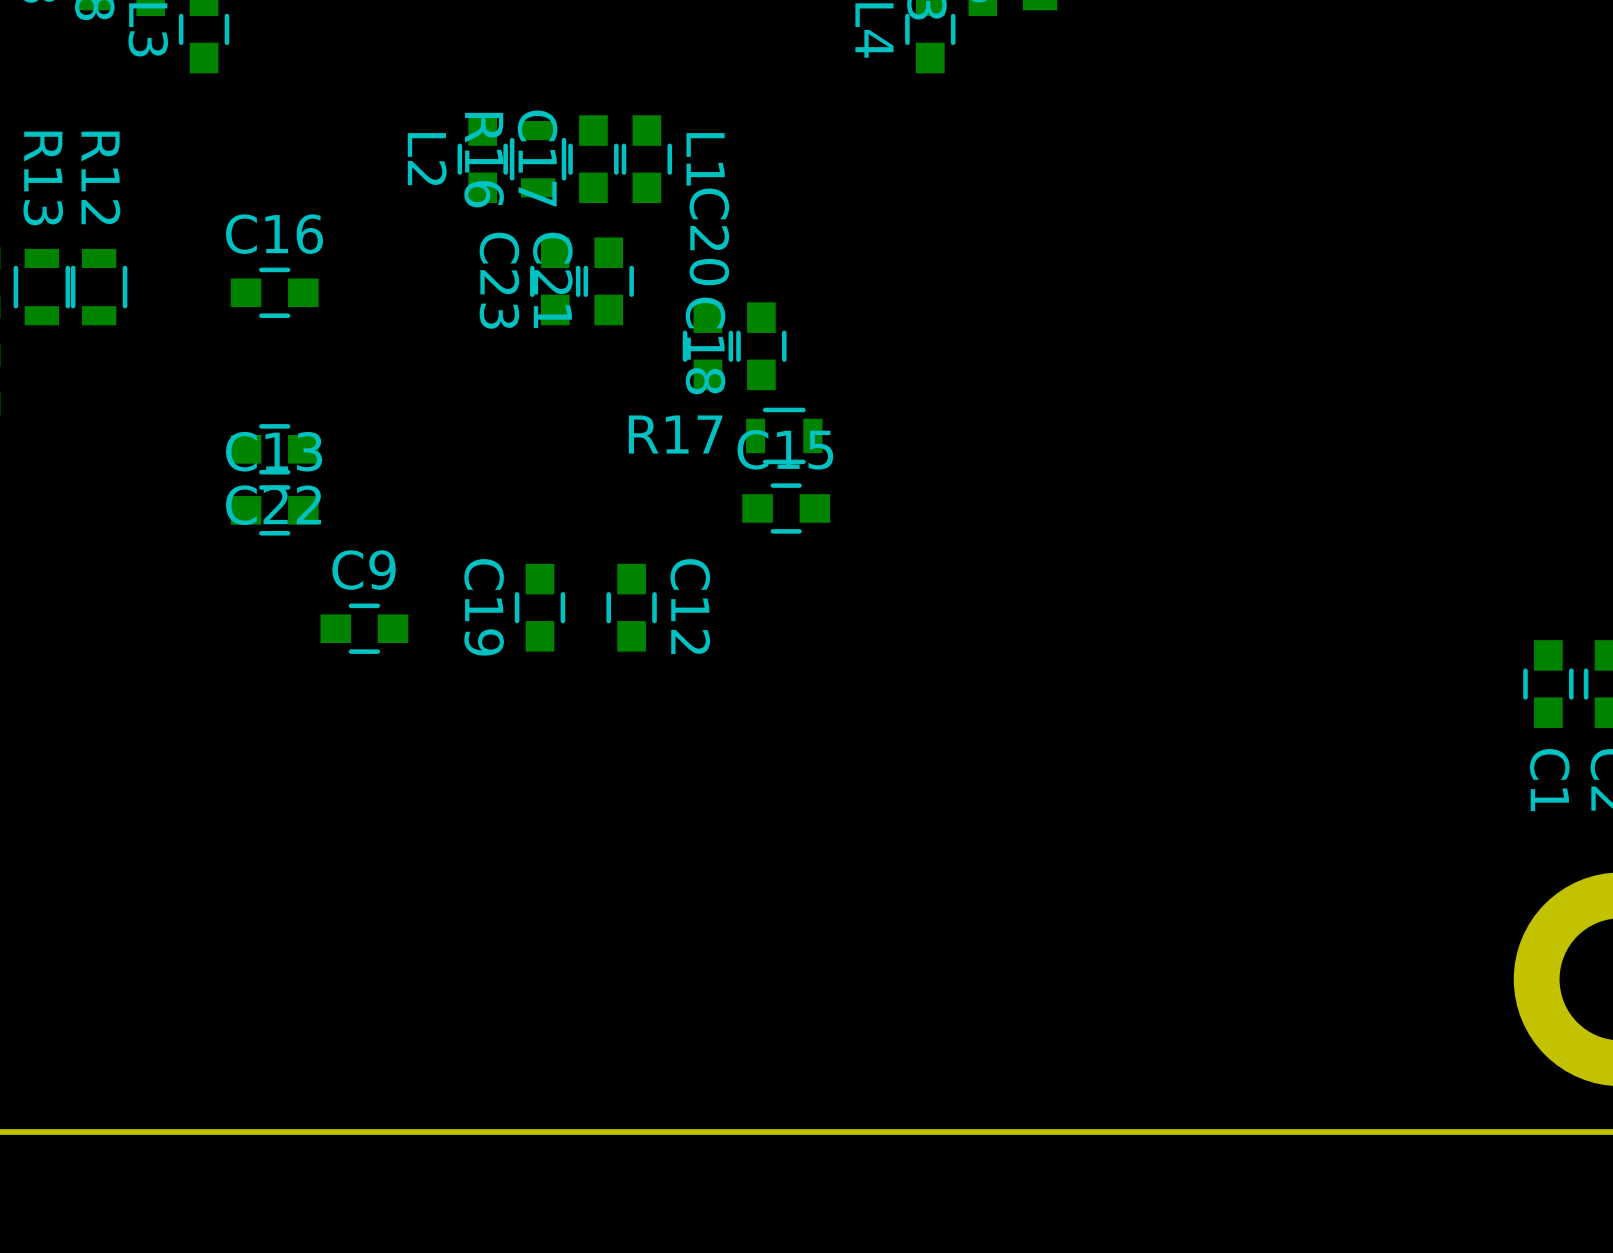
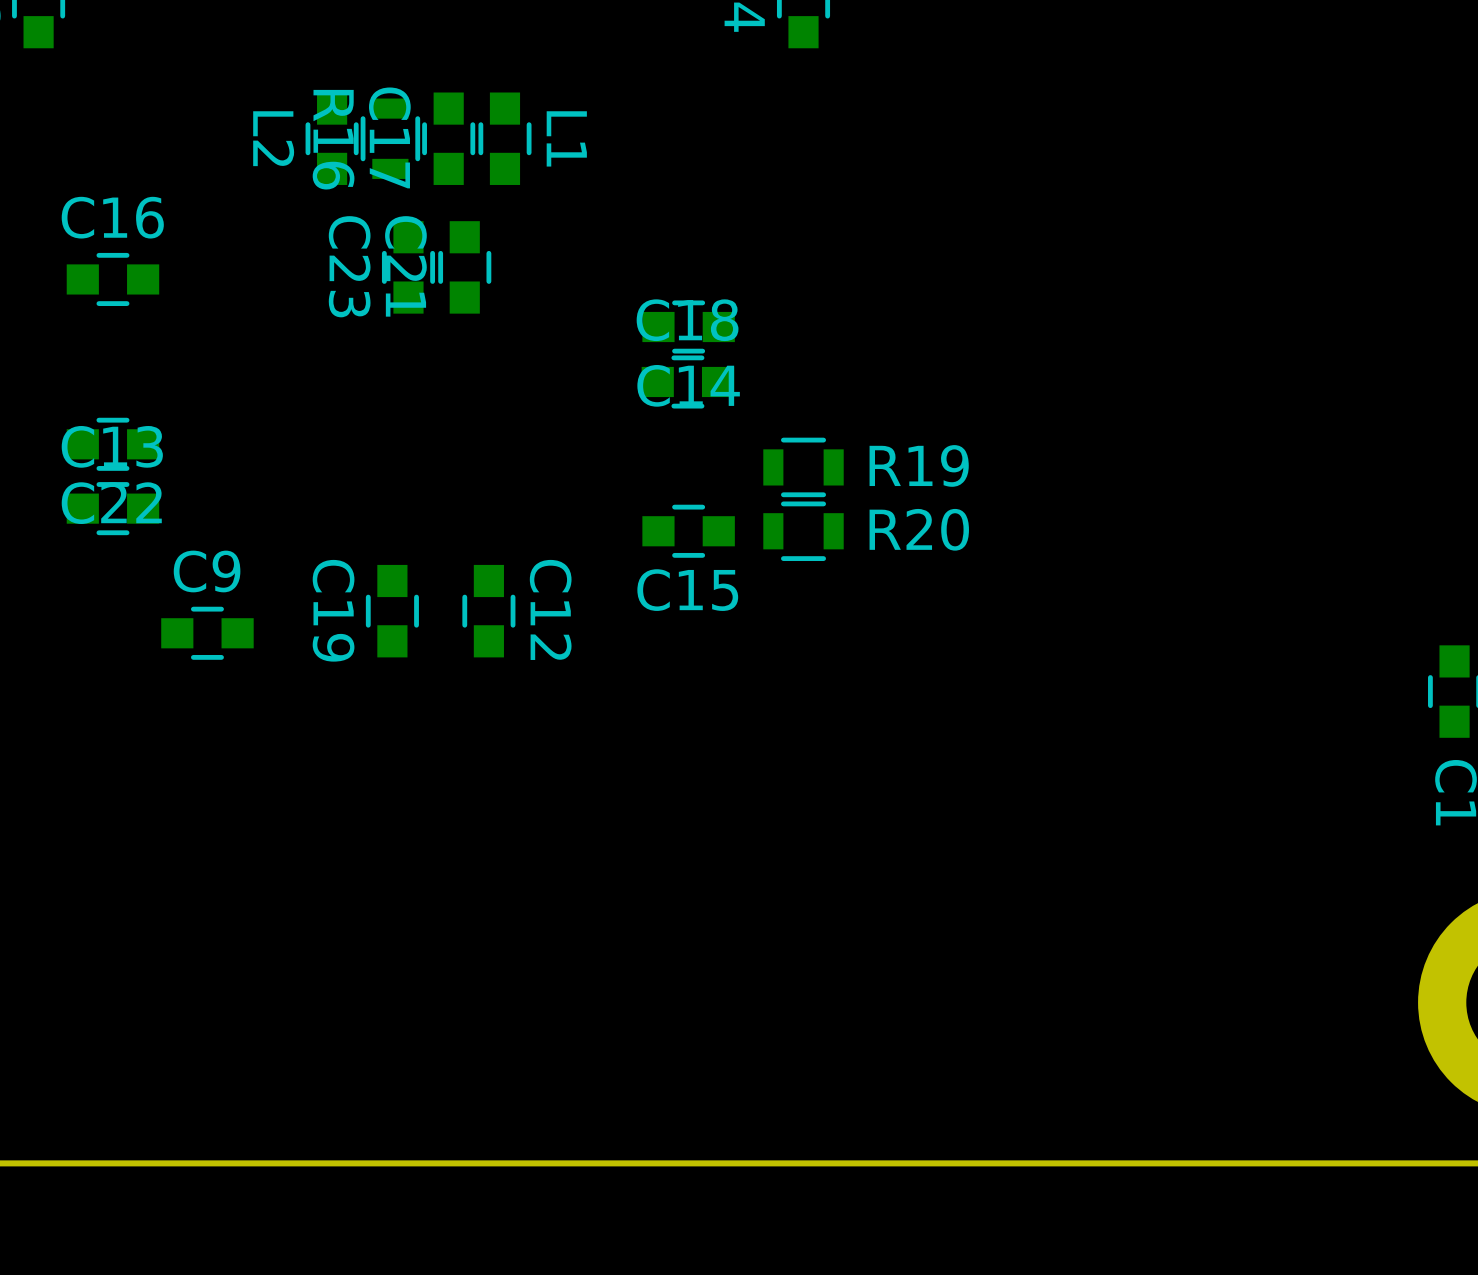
C14: none -> (688, 327)
C20: (707, 346) -> none
C18 rotation: 0° (761, 346) -> 90° clockwise (687, 381)
C18 position: (761, 346) -> (687, 381)
R17: (784, 435) -> none
C15 name position: C15 (785, 449) -> C15 (687, 590)
R19: none -> (803, 467)
C15 position: (786, 508) -> (688, 531)
R20: none -> (803, 531)

